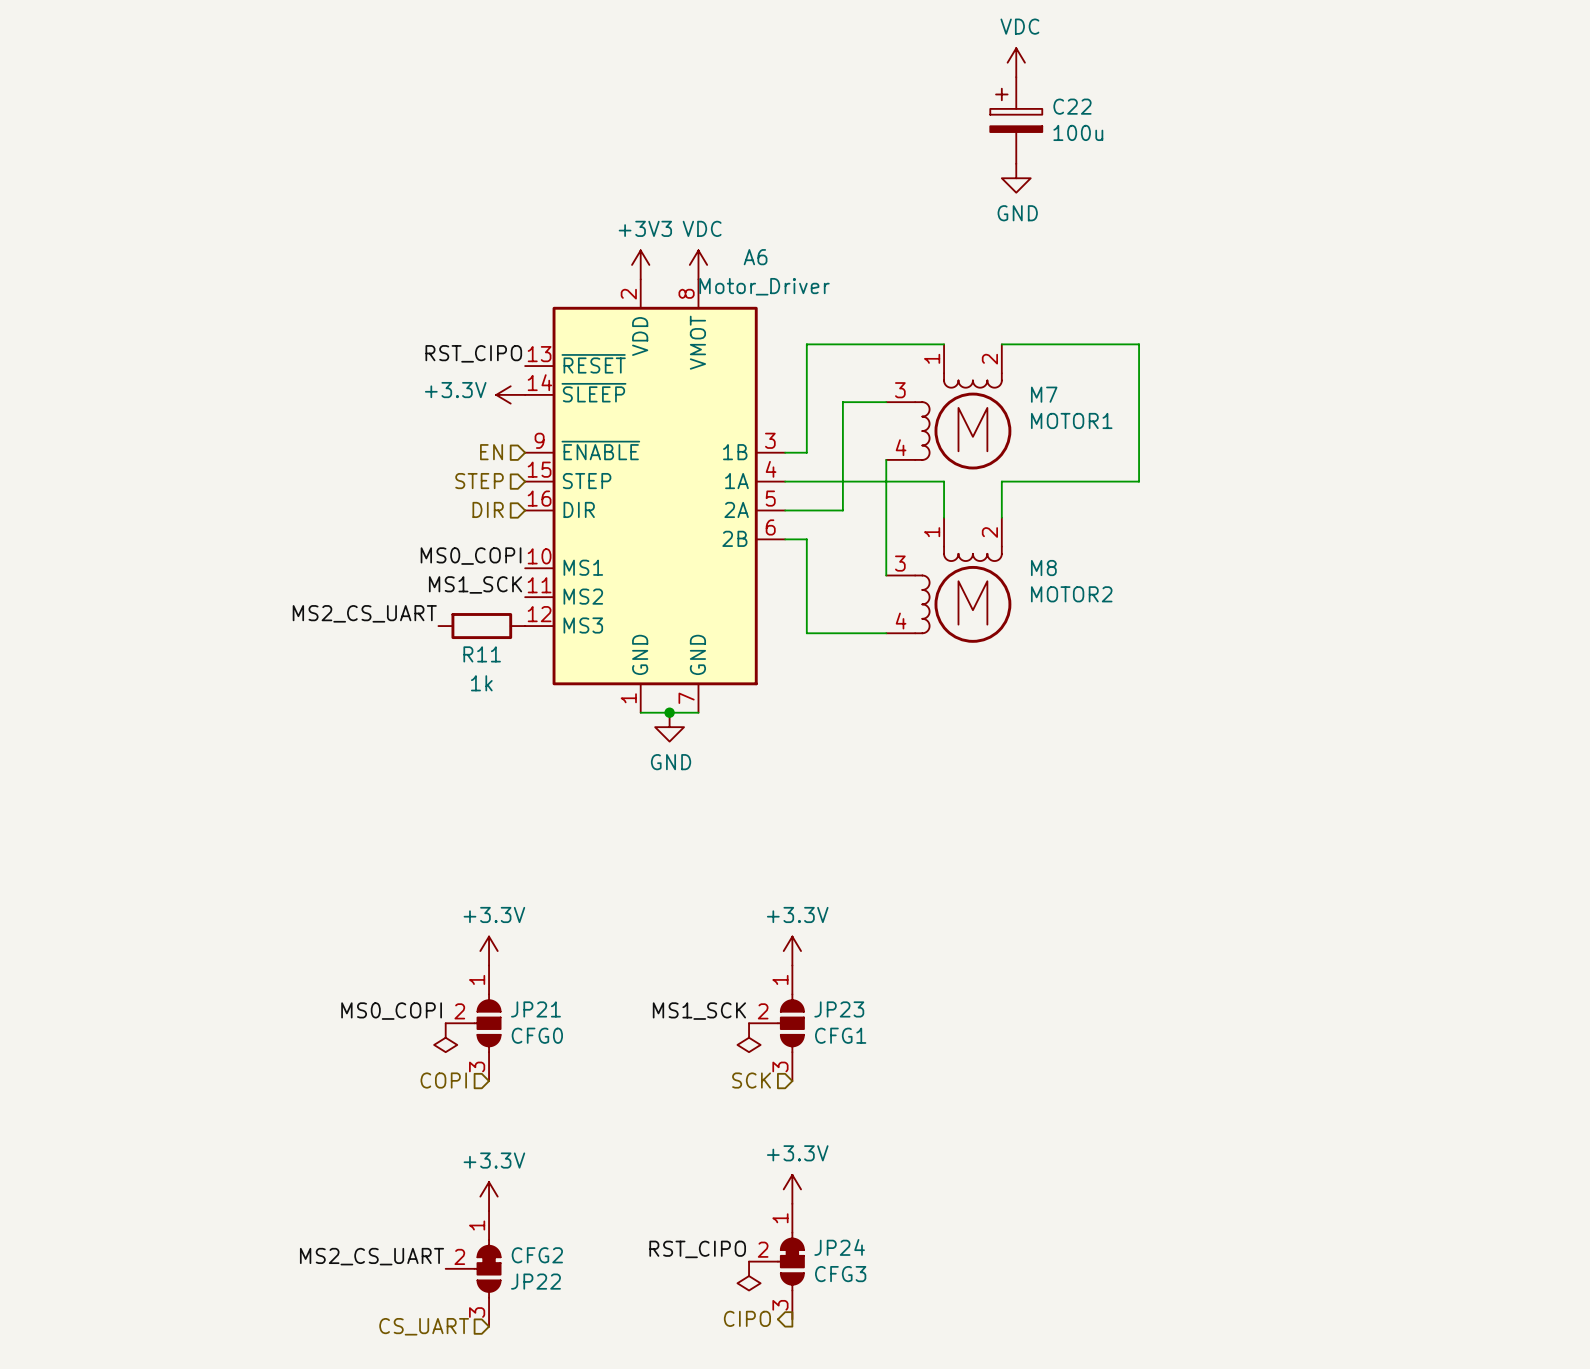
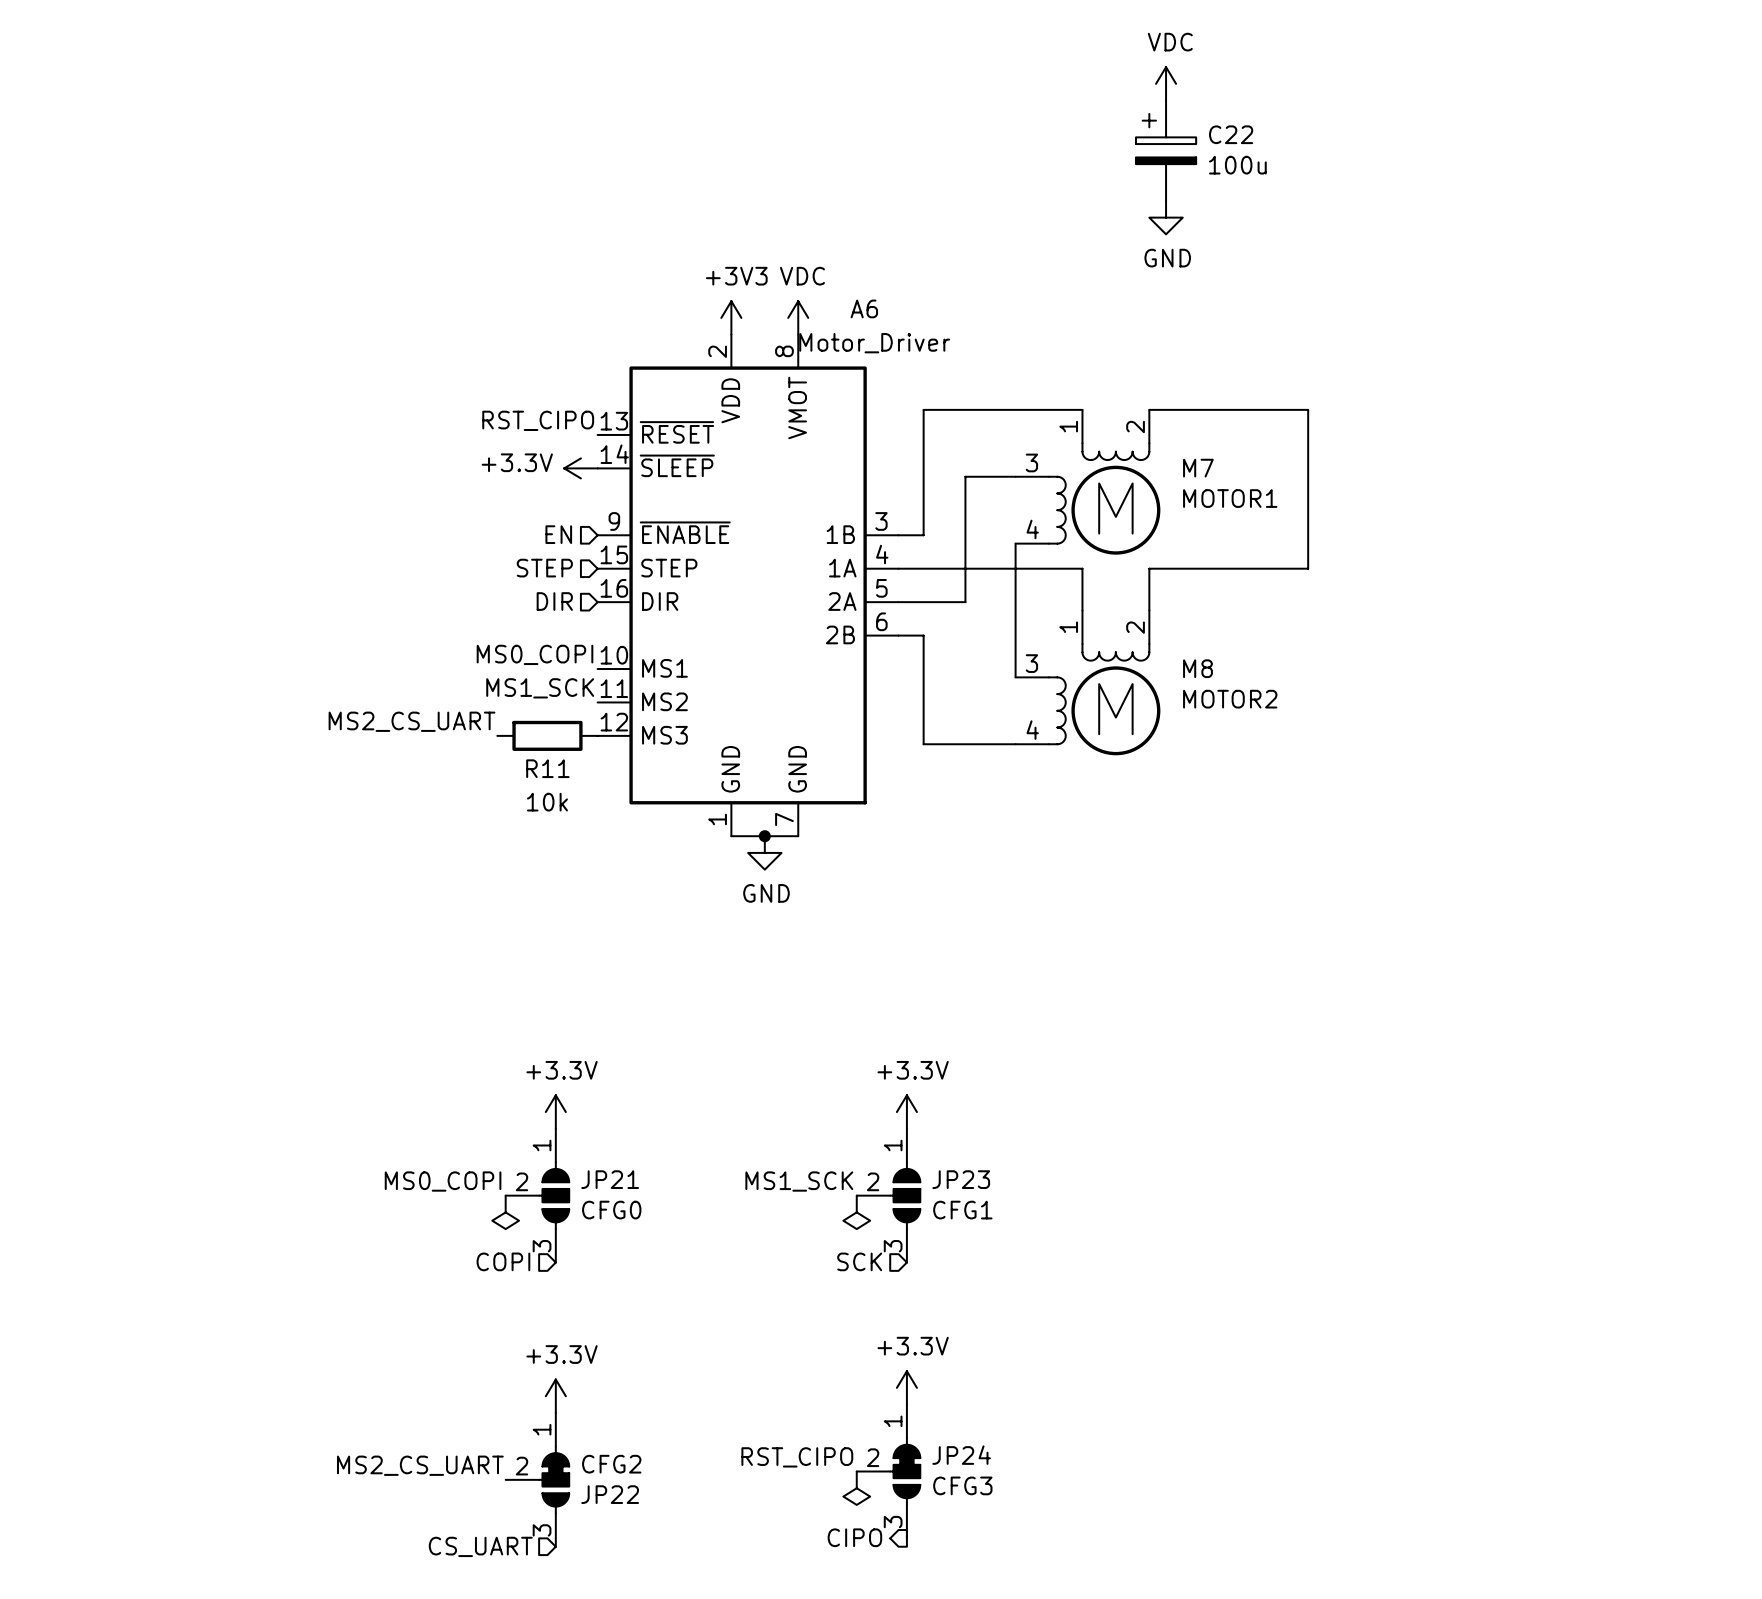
R11 value: 1k (481, 683) -> 10k (547, 802)

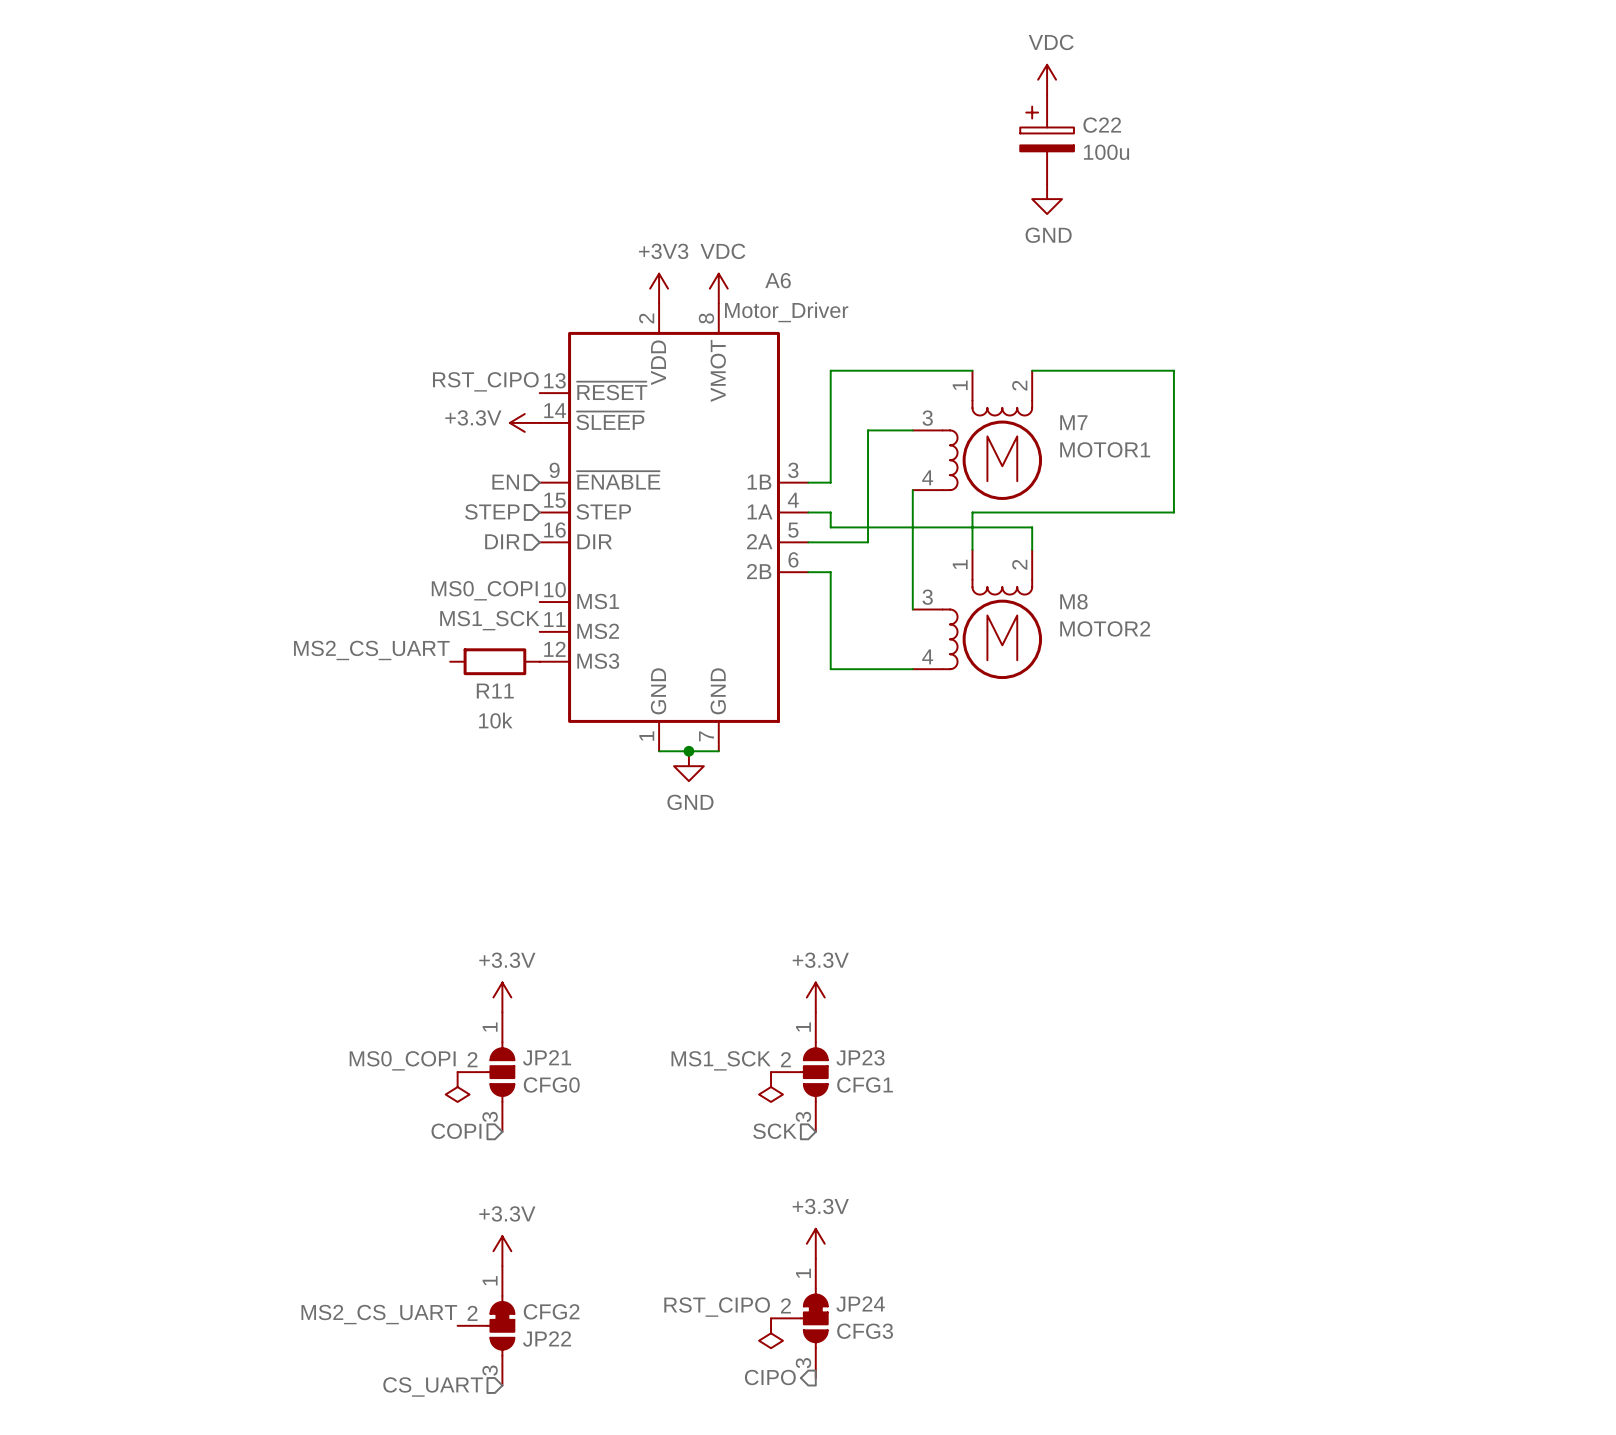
wire: (923, 568) (1082, 568) -> (830, 512) (830, 527) (1032, 527)
wire: (1149, 568) (1149, 585) -> (1032, 512) (972, 512)

